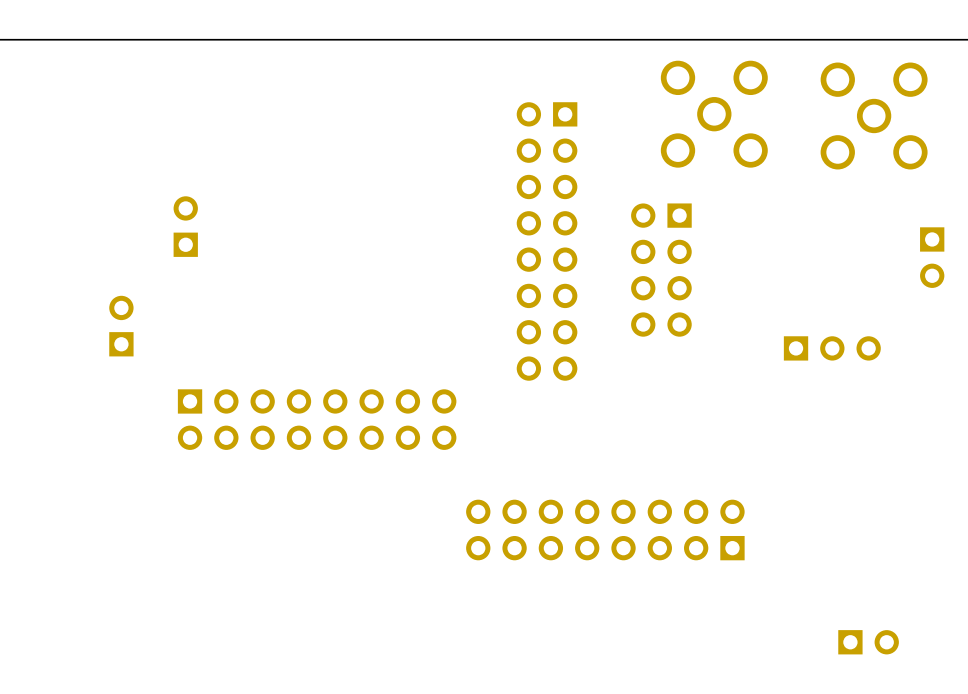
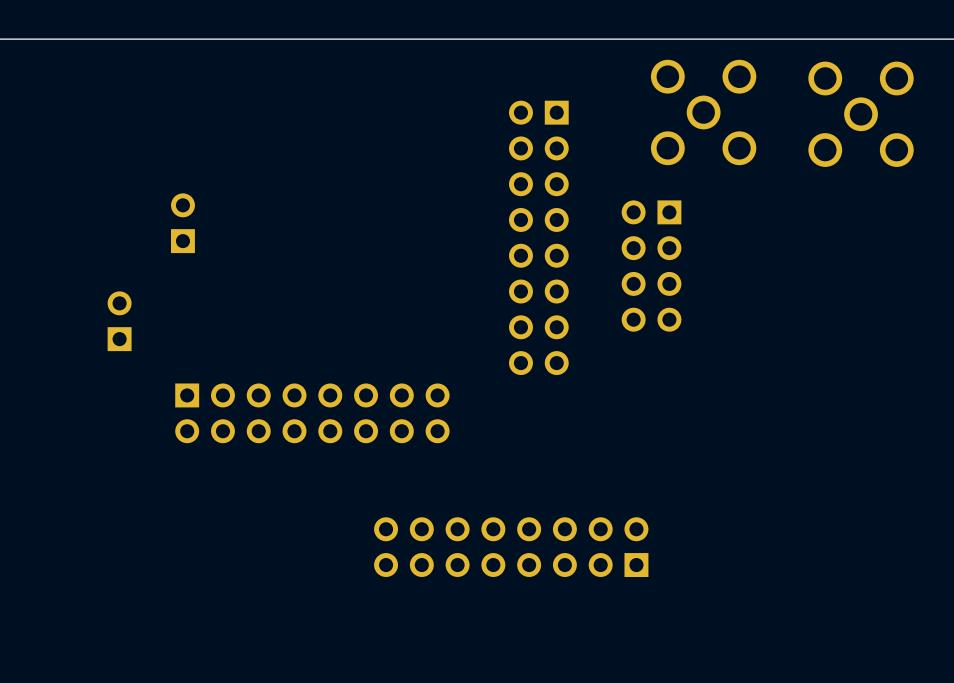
part: (932, 257) -> none
part: (832, 348) -> none
part position: (605, 529) -> (511, 547)
part: (868, 642) -> none

